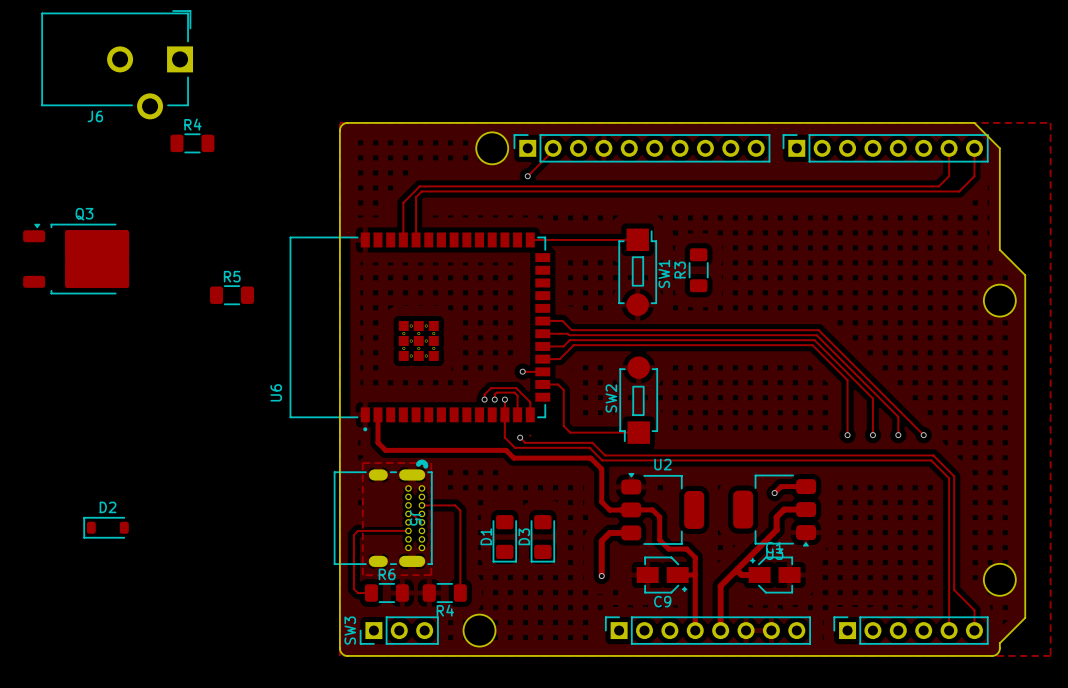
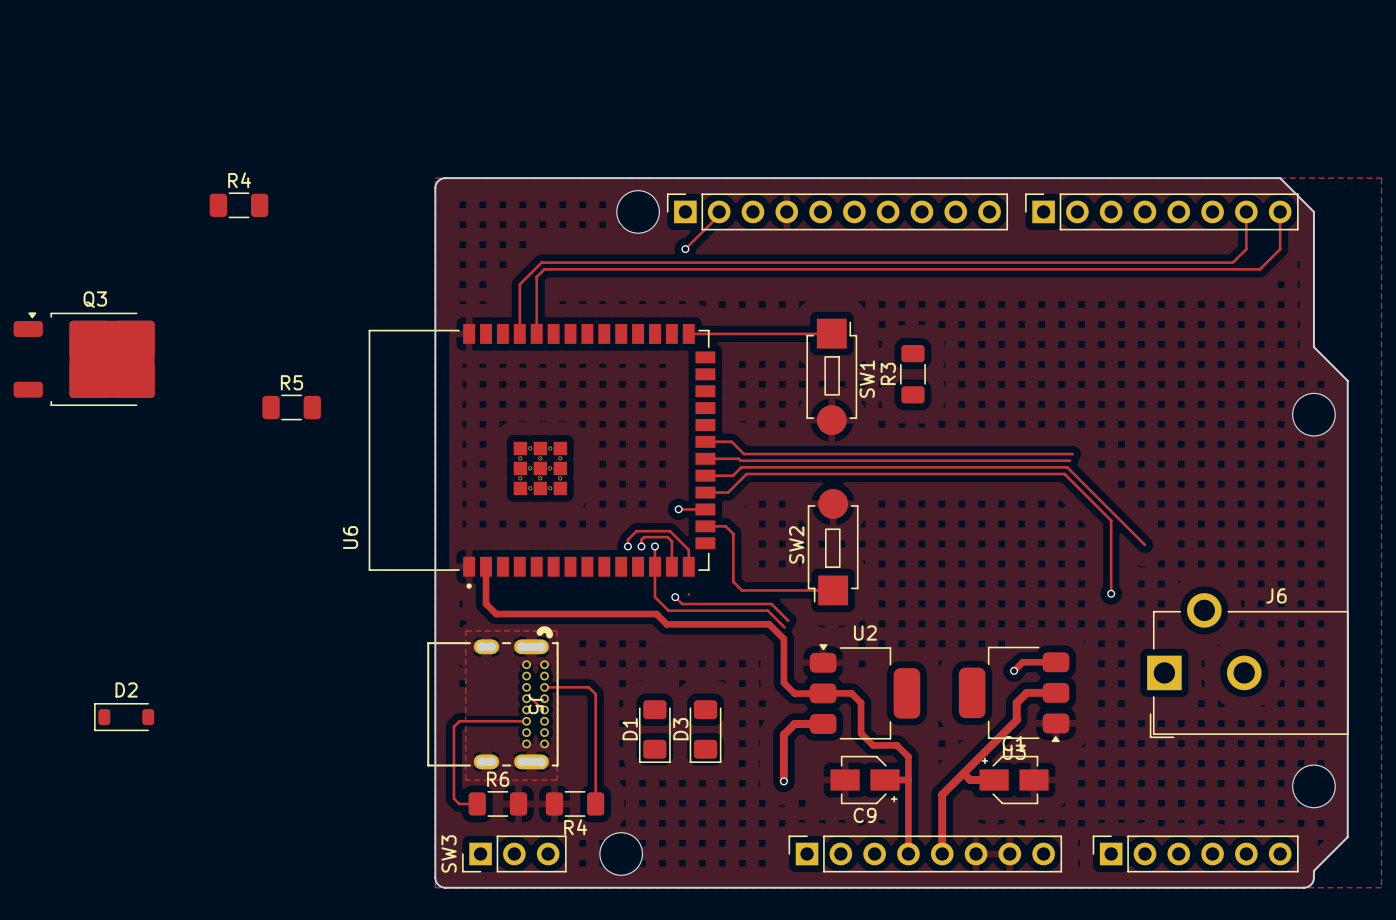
J6 rotation: 0° (117, 64) -> 180° (1247, 665)
J6 position: (117, 64) -> (1247, 665)
track: (818, 330) (923, 435) -> none
track: (816, 335) (898, 416) (898, 435) -> none
track: (872, 398) (872, 435) -> none
via: (872, 435) -> none
via: (898, 435) -> none
via: (923, 435) -> none
track: (605, 455) (933, 455) (954, 476) (954, 589) (974, 610) (974, 630) -> none
track: (602, 460) (931, 460) (949, 478) (949, 630) -> none

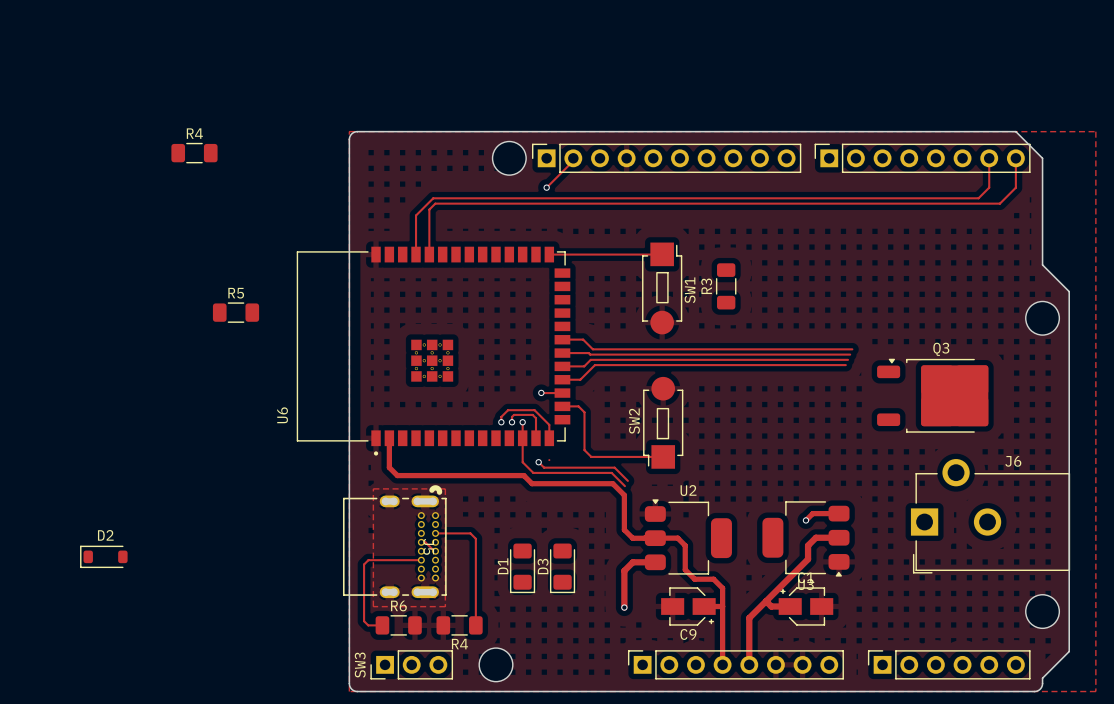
Q3 position: (84, 359) -> (932, 395)
track: (1067, 467) (1144, 545) -> none
track: (1064, 474) (1111, 520) (1111, 593) -> none
via: (1111, 593) -> none

